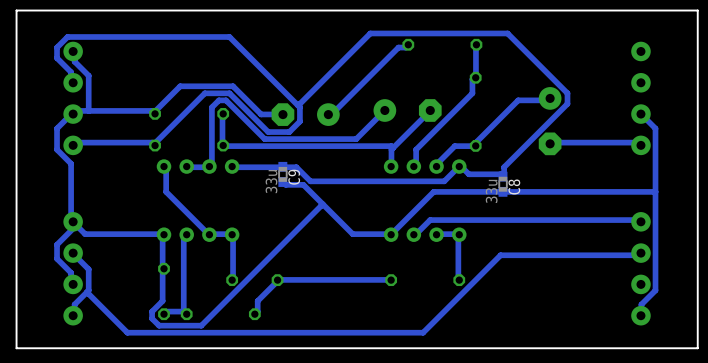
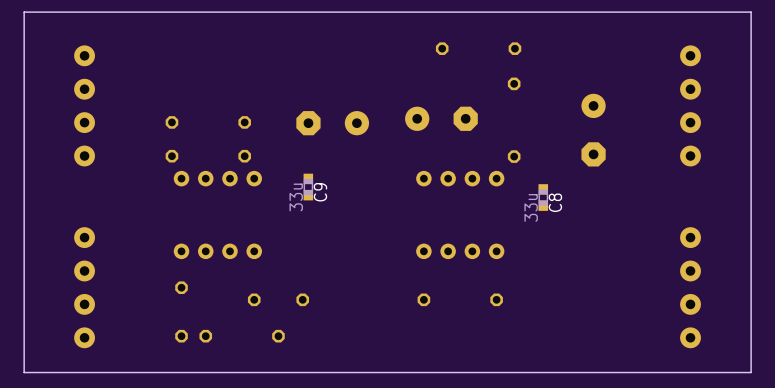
track: (408, 44) (405, 47) (398, 47) (331, 114) (328, 114) -> none
track: (476, 44) (475, 75) (472, 79) (472, 93) (416, 149) (416, 163) (413, 166) -> none
track: (73, 51) (74, 61) (88, 75) (88, 110) -> none
track: (73, 82) (71, 82) (71, 72) (57, 58) (57, 47) (67, 36) (229, 36) (299, 107) (299, 121) (289, 132) (268, 132) (229, 93) (204, 93) (155, 142) (155, 145) (152, 142) (74, 142) (73, 145) -> none
track: (550, 98) (549, 100) (518, 100) (475, 142) (475, 145) (454, 146) (436, 166) -> none
track: (298, 105) (370, 33) (507, 33) (567, 93) (567, 103) (504, 167) (502, 176) (500, 174) (468, 174) (459, 166) (444, 181) (310, 181) (296, 167) (232, 166) -> none
track: (384, 110) (356, 139) (264, 139) (226, 100) (218, 100) (211, 107) (211, 163) (208, 167) (186, 166) -> none
track: (430, 110) (391, 149) (391, 166) -> none
track: (223, 113) (222, 142) (223, 145) (226, 146) (391, 146) (393, 147) -> none
track: (282, 114) (261, 114) (233, 86) (180, 86) (155, 110) (155, 113) (152, 110) (74, 110) (57, 128) (57, 149) (71, 163) (71, 220) (73, 221) -> none
track: (640, 114) (655, 128) (655, 290) (641, 304) (640, 315) -> none
track: (550, 143) (637, 142) (640, 145) -> none
track: (164, 166) (166, 167) (166, 191) (208, 234) (232, 234) (232, 280) -> none
track: (282, 182) (285, 184) (303, 184) (352, 234) (391, 234) (433, 191) (655, 191) -> none
track: (322, 204) (201, 325) (159, 325) (152, 318) (152, 311) (162, 301) (164, 234) (85, 234) (73, 221) -> none
track: (73, 221) (74, 227) (57, 244) (57, 258) (71, 272) (71, 283) (73, 284) -> none
track: (640, 221) (637, 220) (430, 220) (413, 234) -> none
track: (186, 234) (183, 237) (183, 311) -> none
track: (436, 234) (459, 234) (459, 280) -> none
track: (73, 253) (88, 269) (88, 290) (74, 304) (73, 315) -> none
track: (640, 253) (637, 255) (500, 255) (423, 332) (127, 332) (86, 292) -> none
track: (391, 280) (277, 280) (257, 301) (257, 311) (254, 314) -> none
track: (183, 311) (166, 311) (164, 314) -> none

